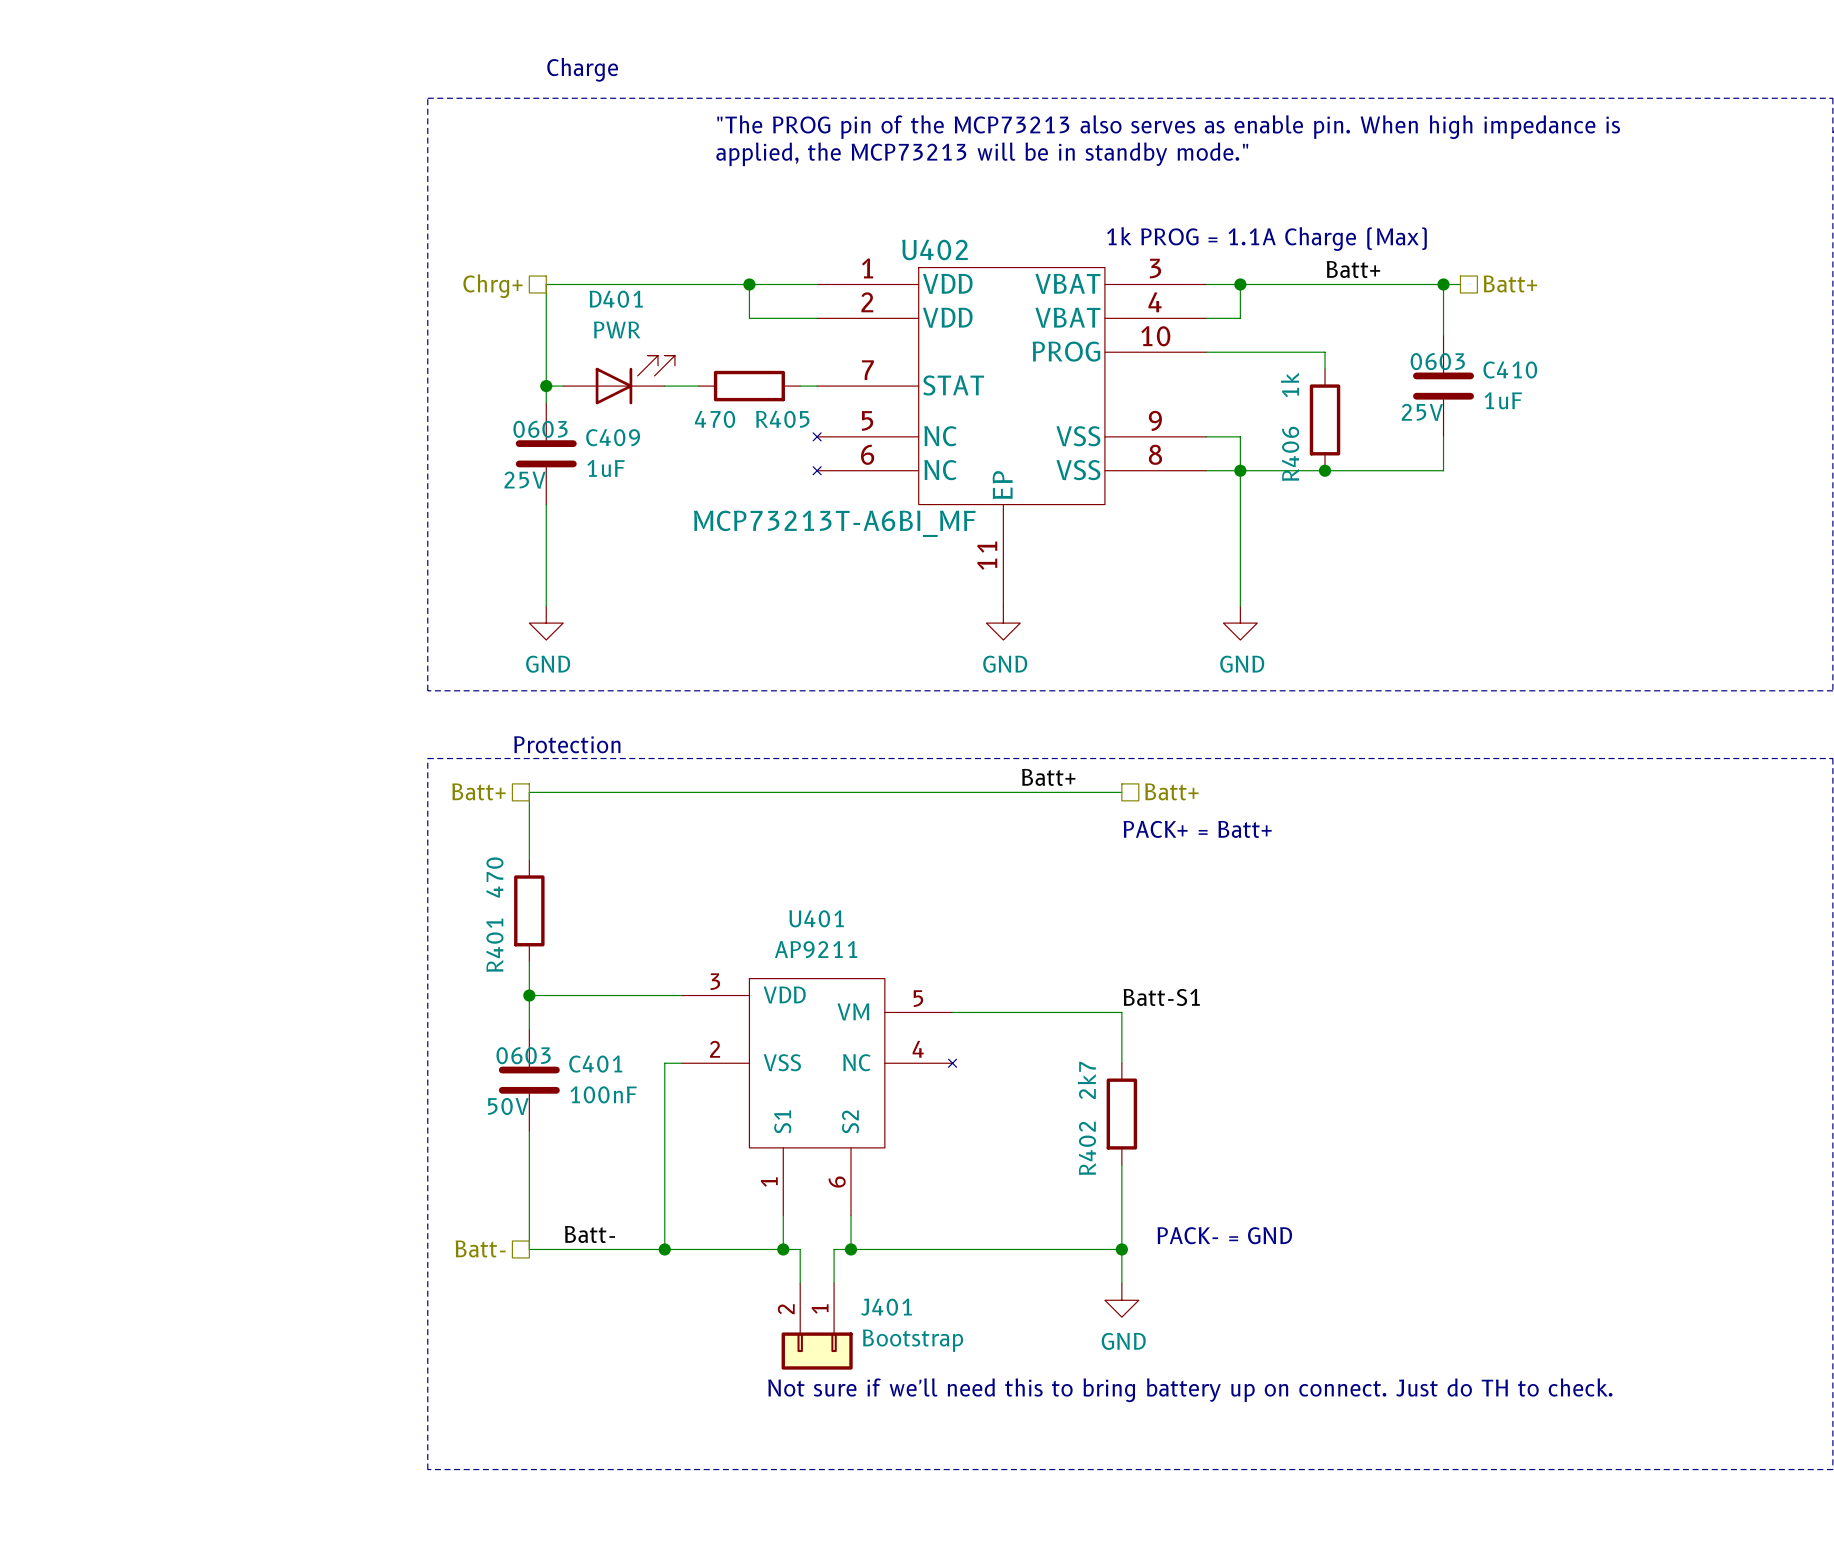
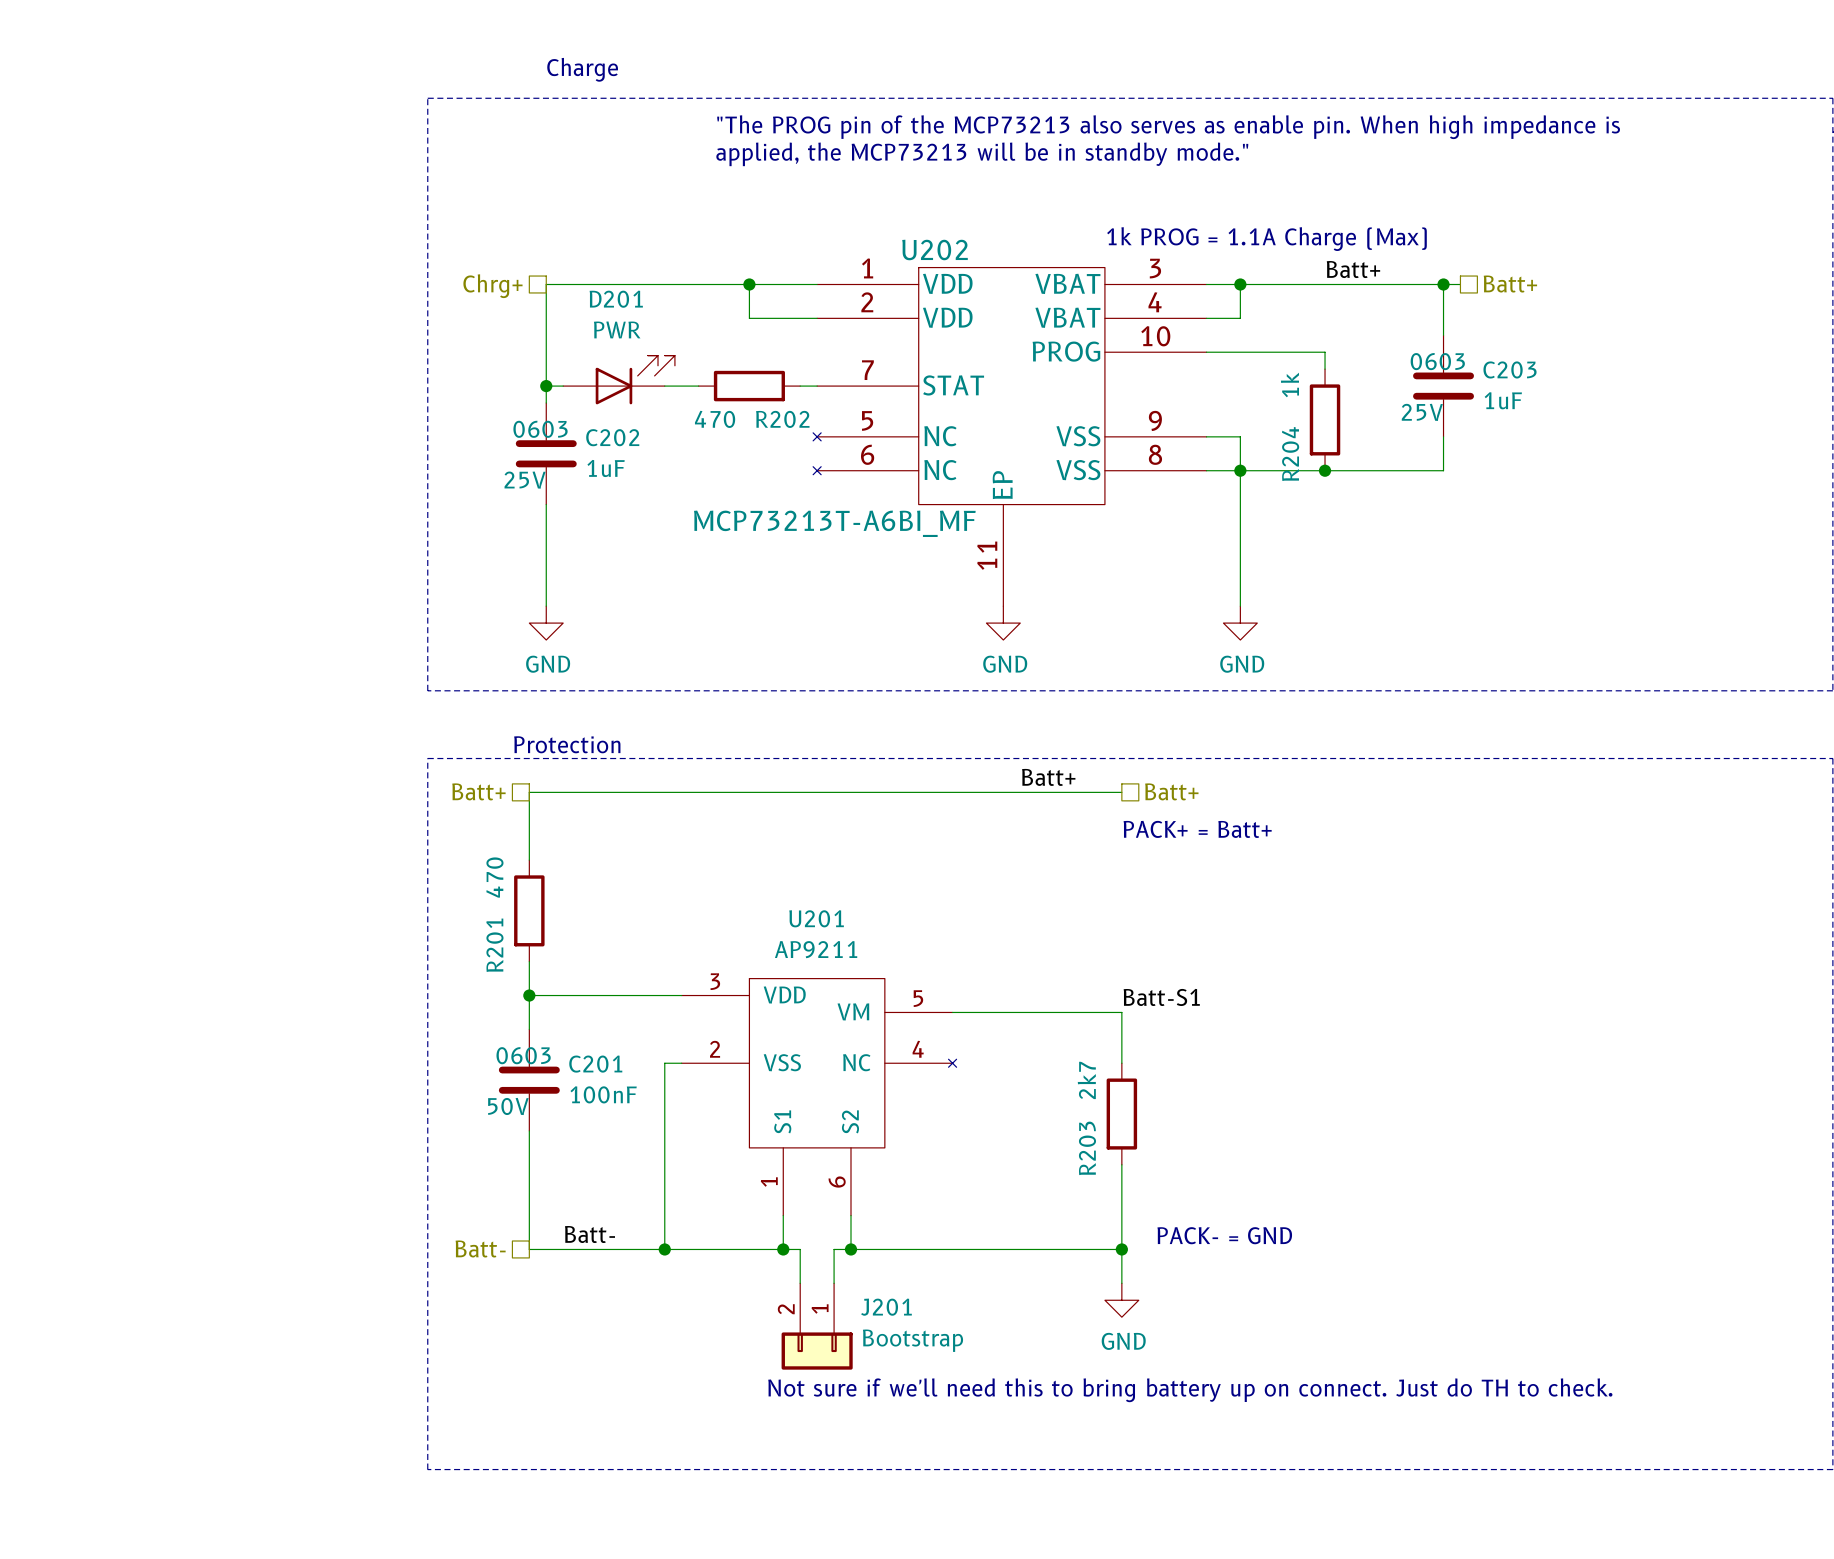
U402 name: U402 (935, 249) -> U202 (935, 249)
D401 name: D401 (616, 299) -> D201 (616, 299)
C410 name: C410 (1510, 369) -> C203 (1510, 369)
R405 name: R405 (782, 419) -> R202 (782, 419)
C409 name: C409 (613, 437) -> C202 (612, 437)
R406 name: R406 (1290, 453) -> R204 (1290, 454)
U401 name: U401 (816, 918) -> U201 (816, 918)
R401 name: R401 (494, 945) -> R201 (494, 945)
C401 name: C401 (595, 1064) -> C201 (595, 1064)
R402 name: R402 (1087, 1148) -> R203 (1087, 1148)
J401 name: J401 (886, 1307) -> J201 (886, 1307)

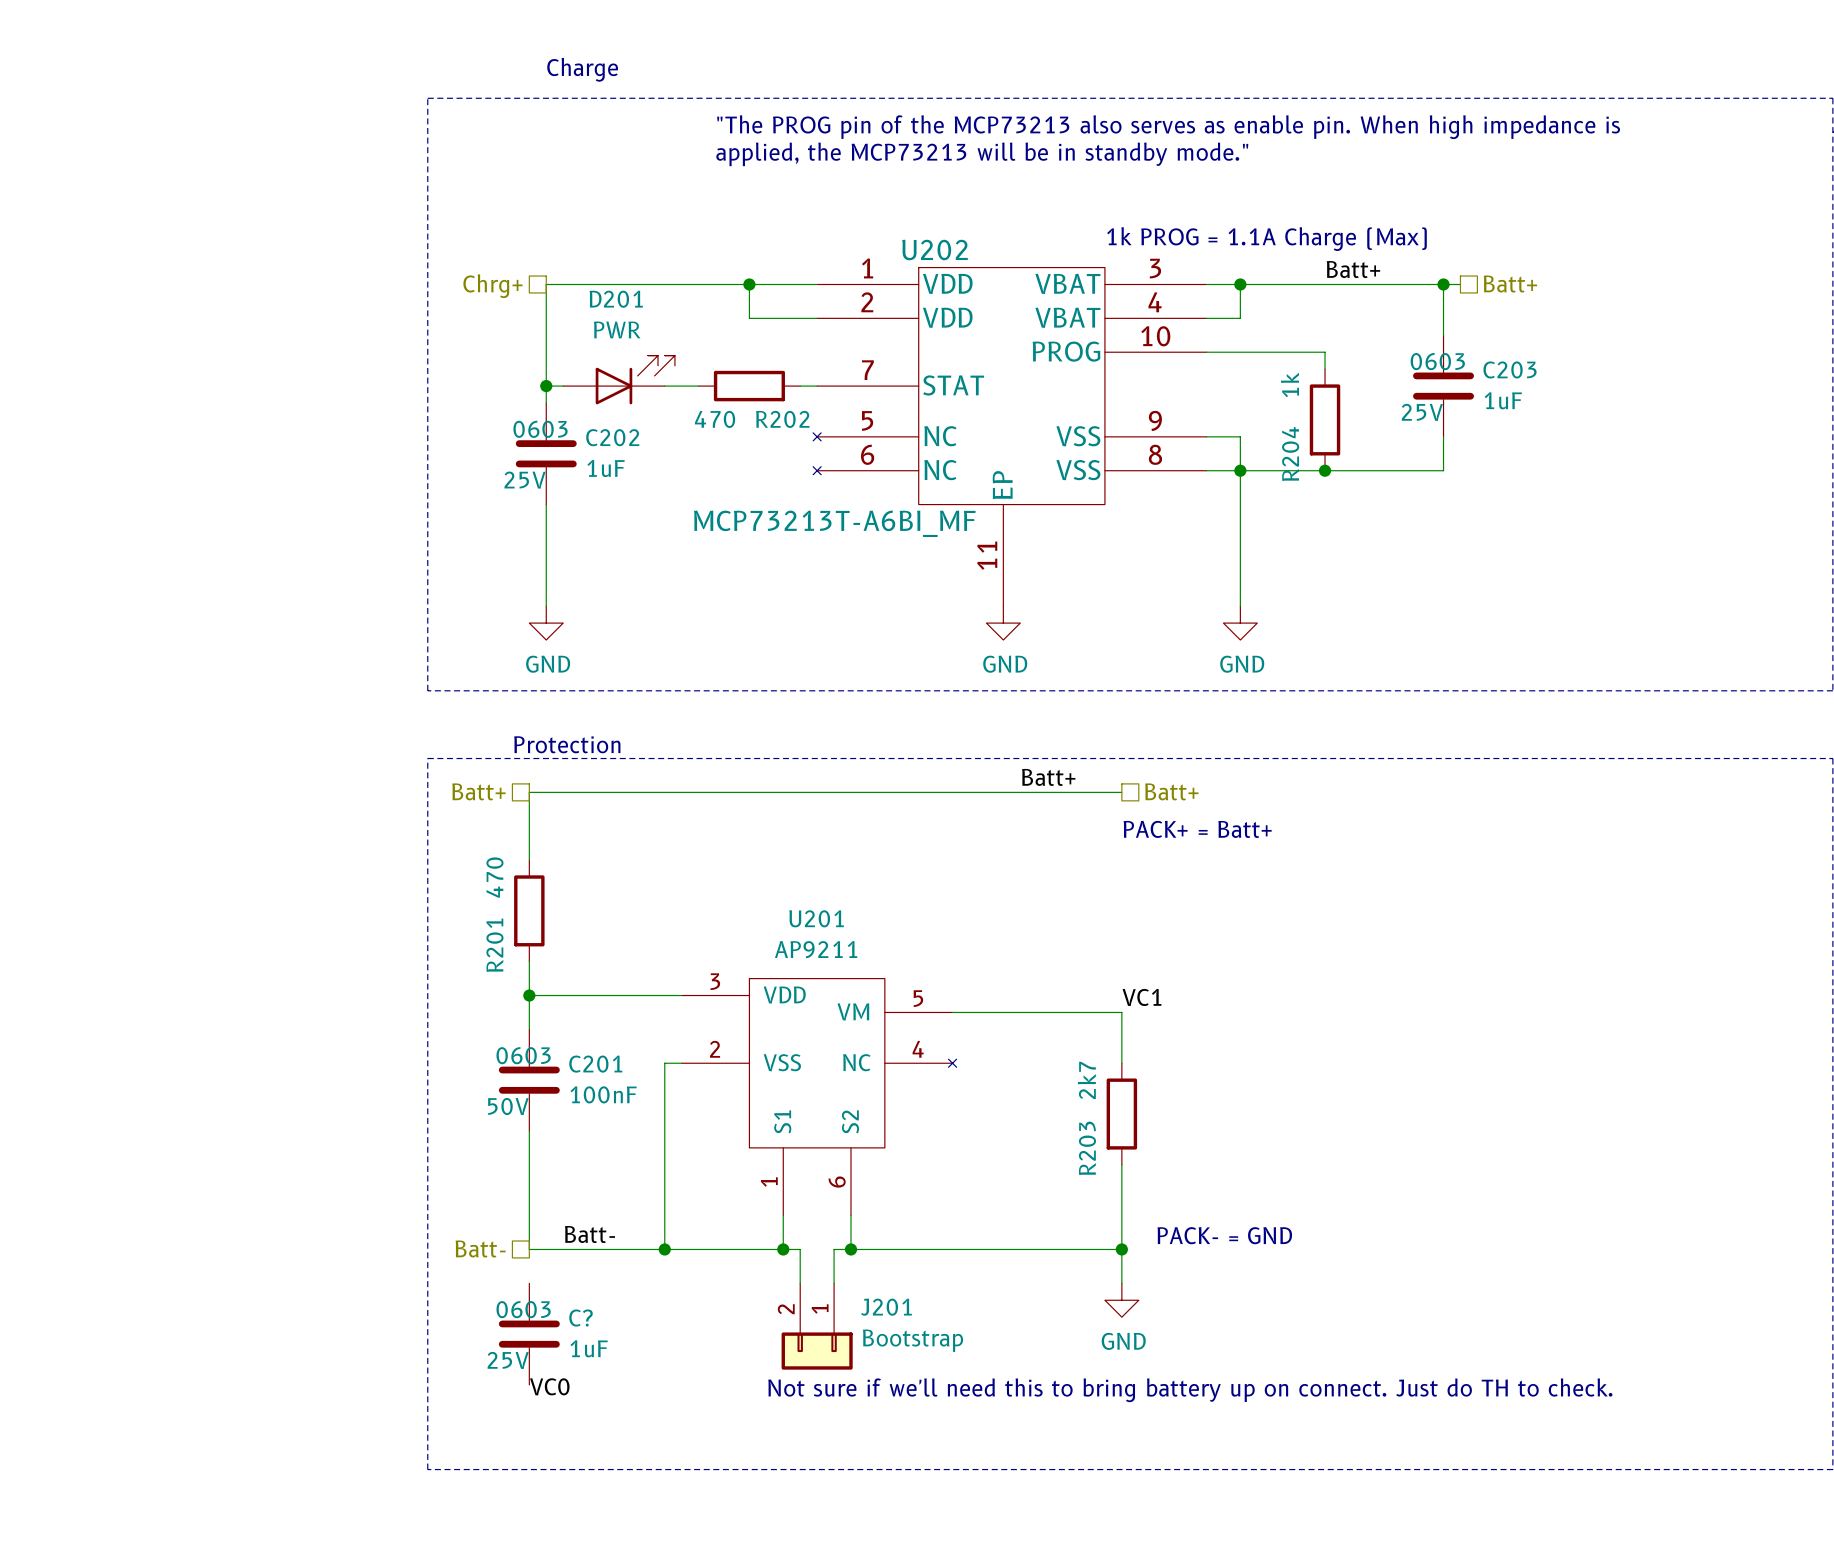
label: Batt-S1 (1161, 997) -> VC1 (1142, 997)
C?: none -> 1uF (529, 1334)
label: none -> VC0 (549, 1386)

